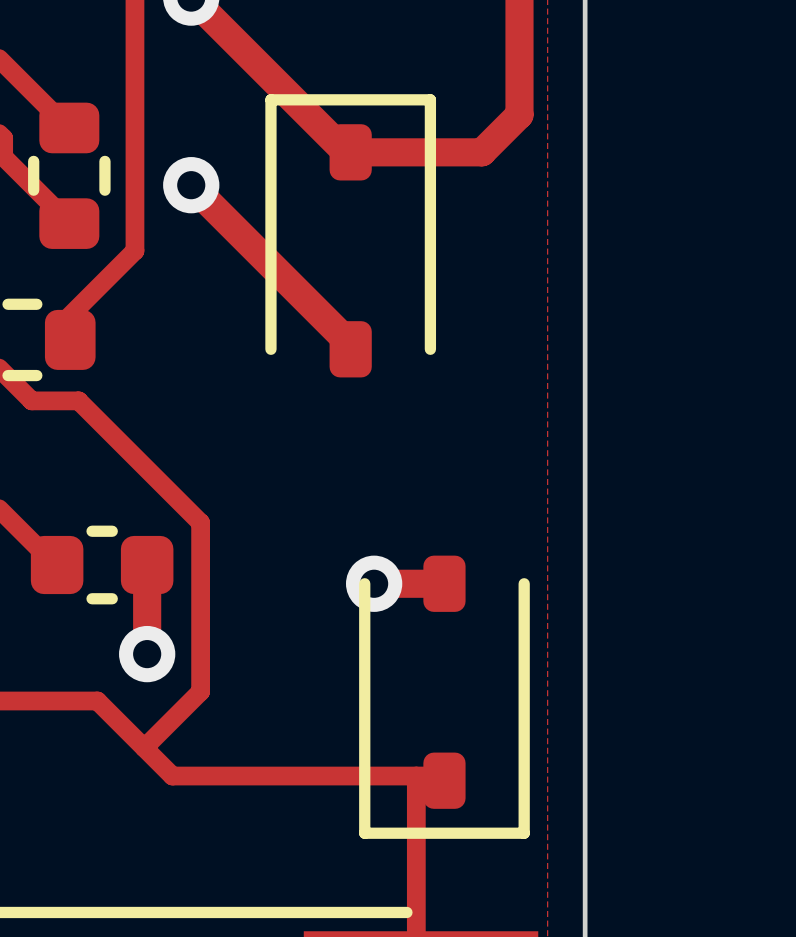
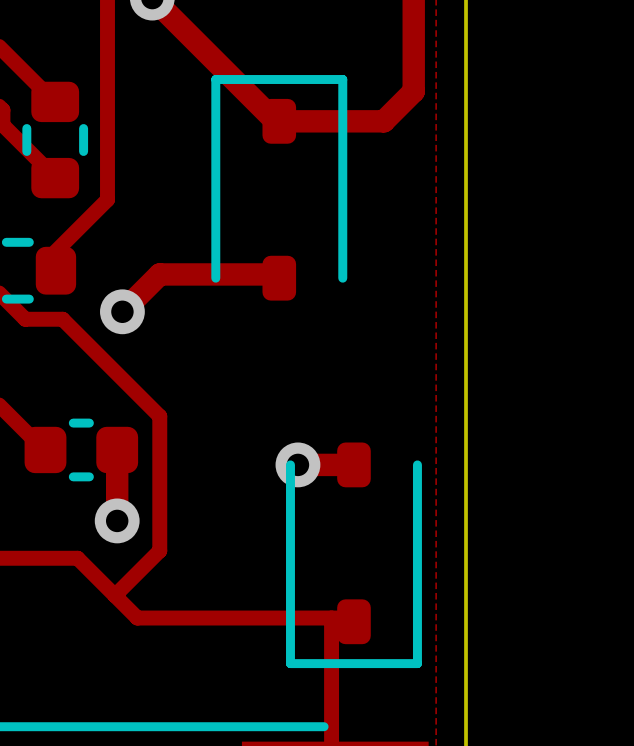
track: (191, 185) (350, 344) -> (122, 311) (159, 274) (279, 274)
via: (191, 185) -> none
via: none -> (122, 311)

